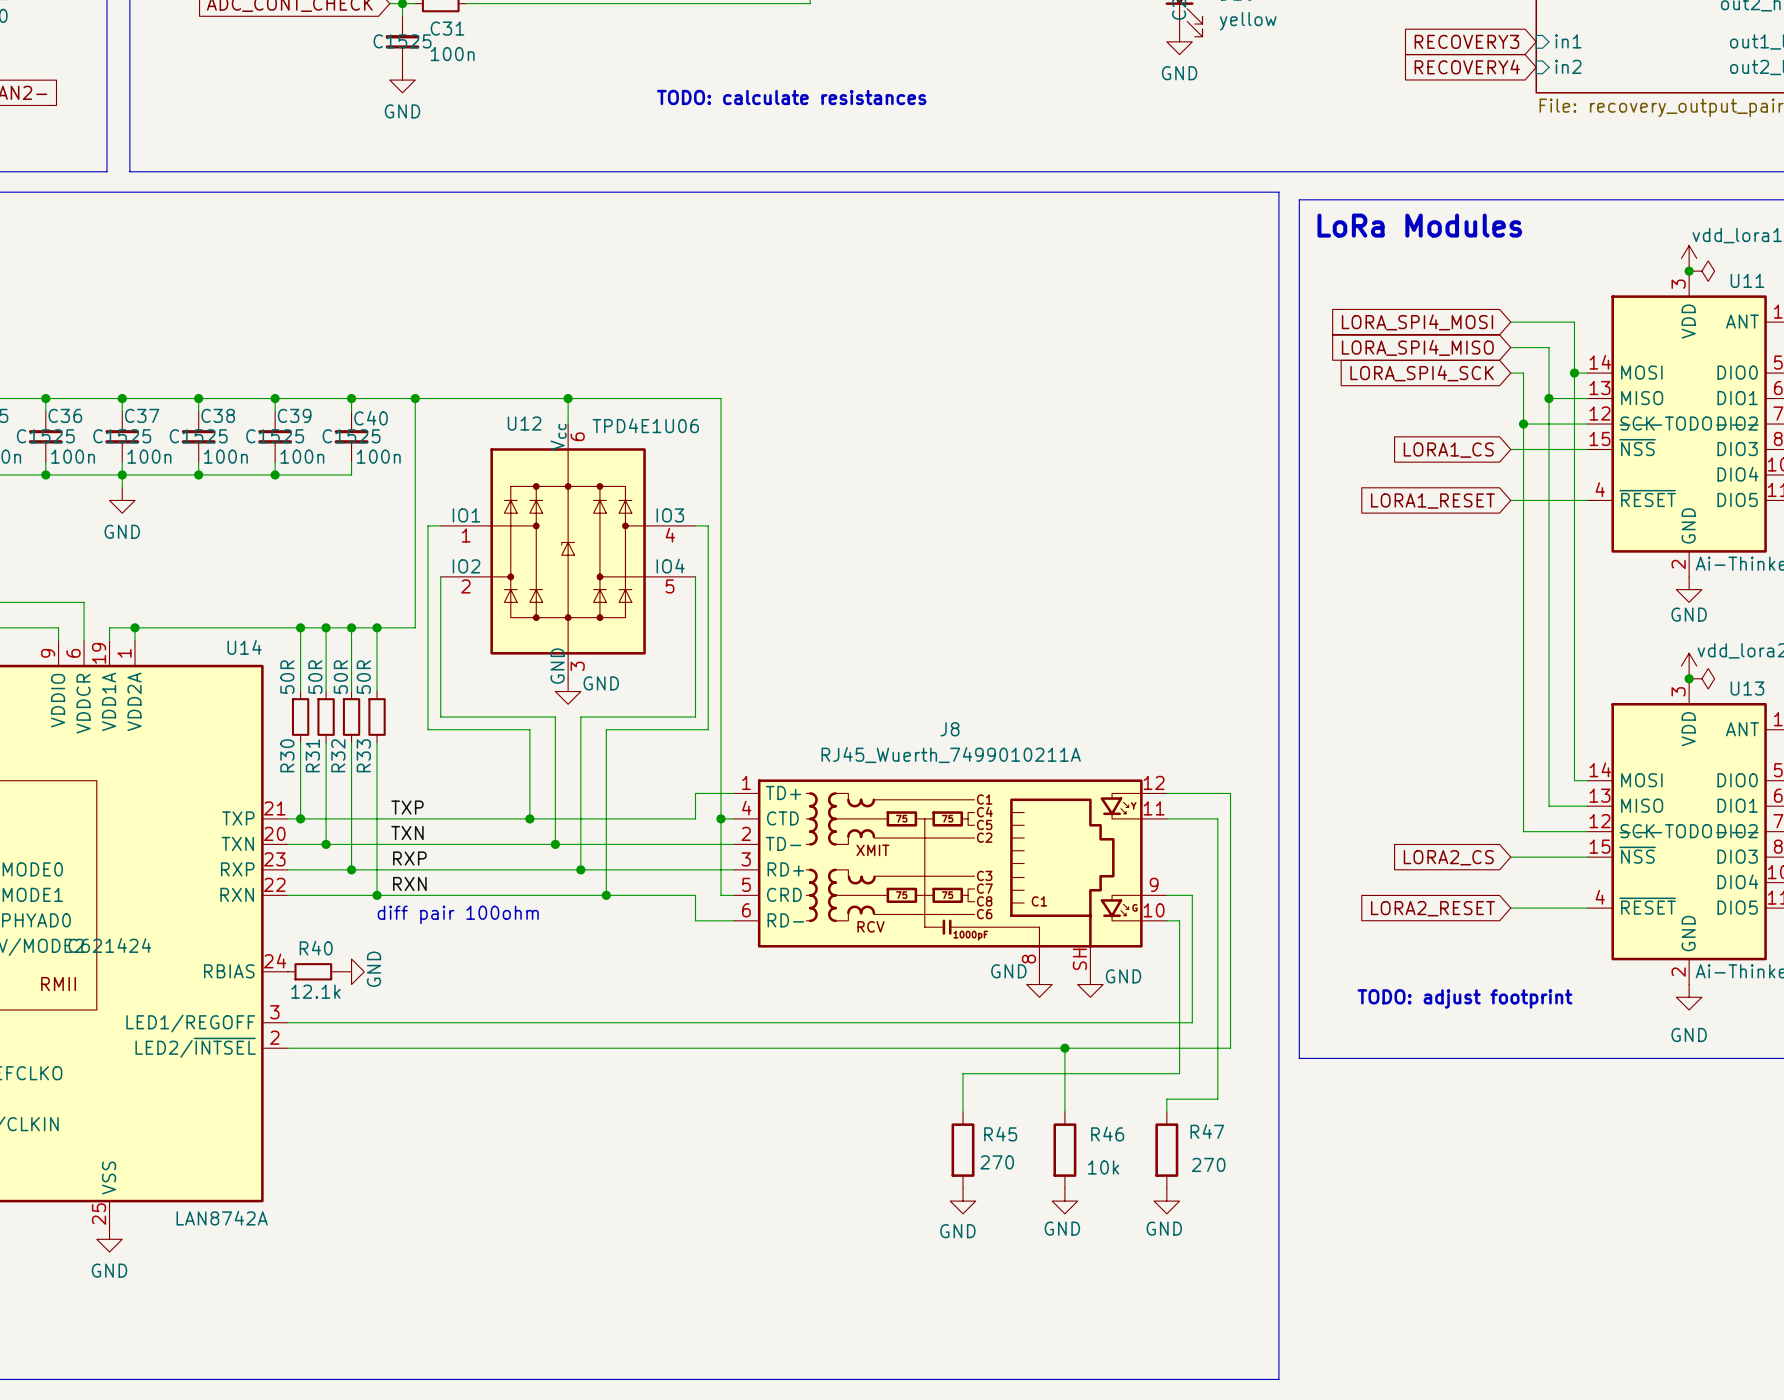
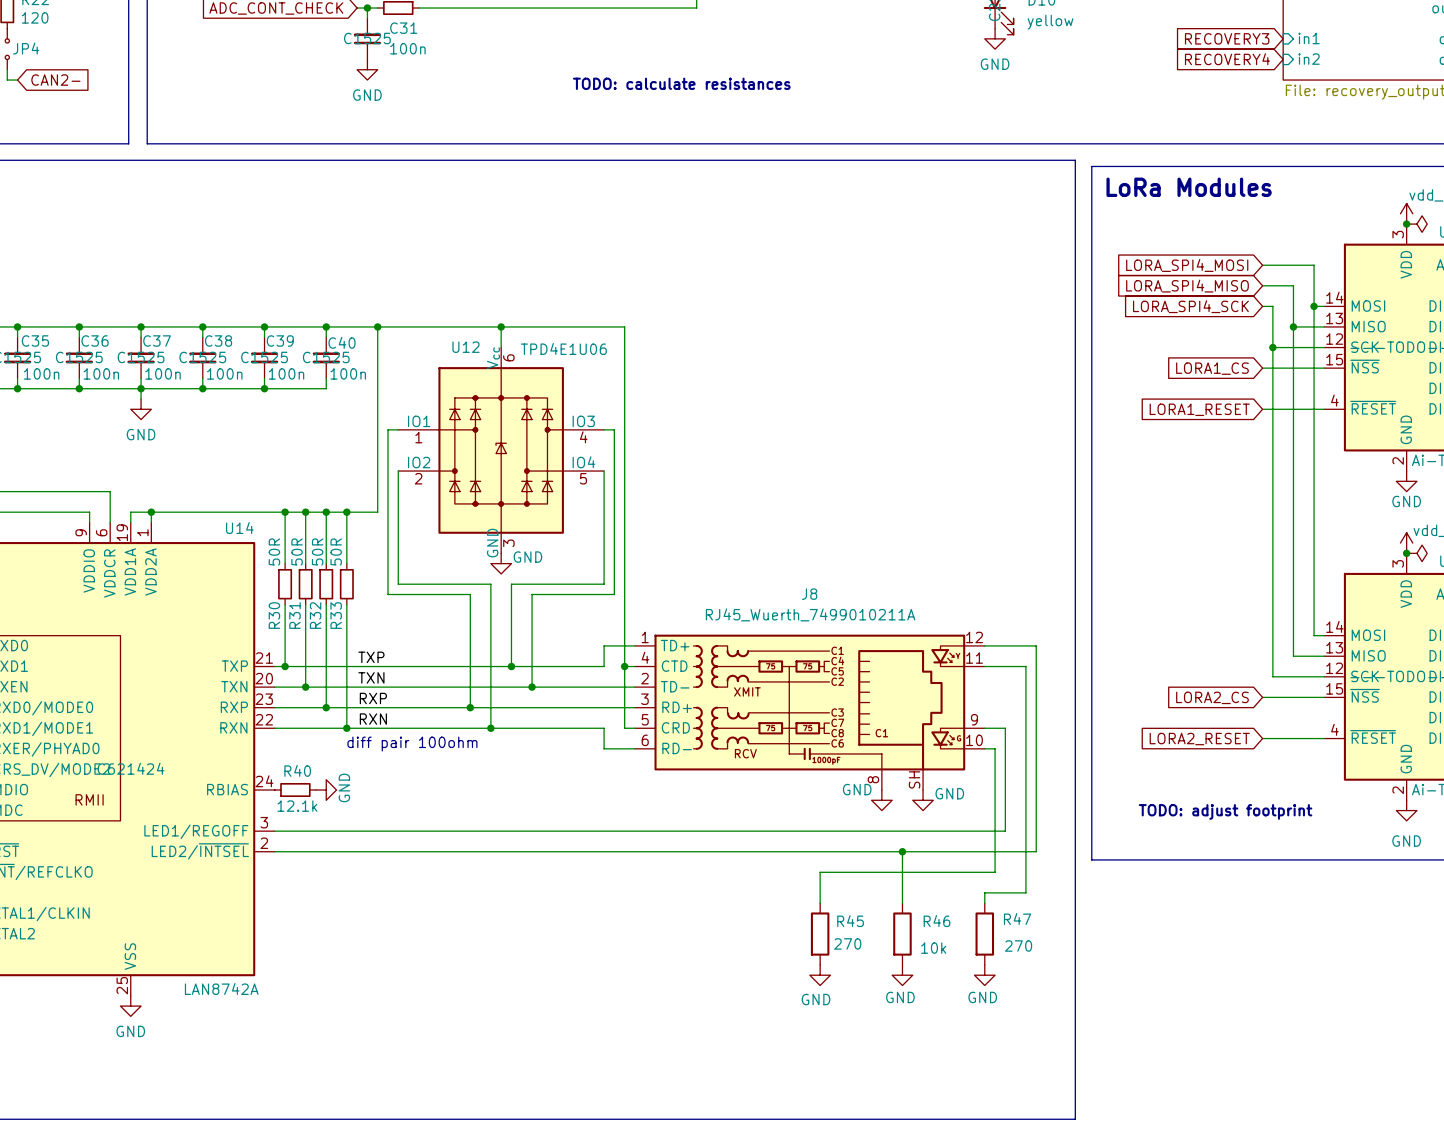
junction: (529, 818) -> none
wire: (580, 818) (580, 869) -> (470, 666) (470, 707)
junction: none -> (511, 666)
junction: (555, 844) -> none
wire: (606, 844) (606, 895) -> (490, 687) (490, 728)
junction: none -> (532, 687)
junction: none -> (470, 707)
junction: (580, 869) -> none
junction: none -> (490, 728)
junction: (606, 895) -> none

